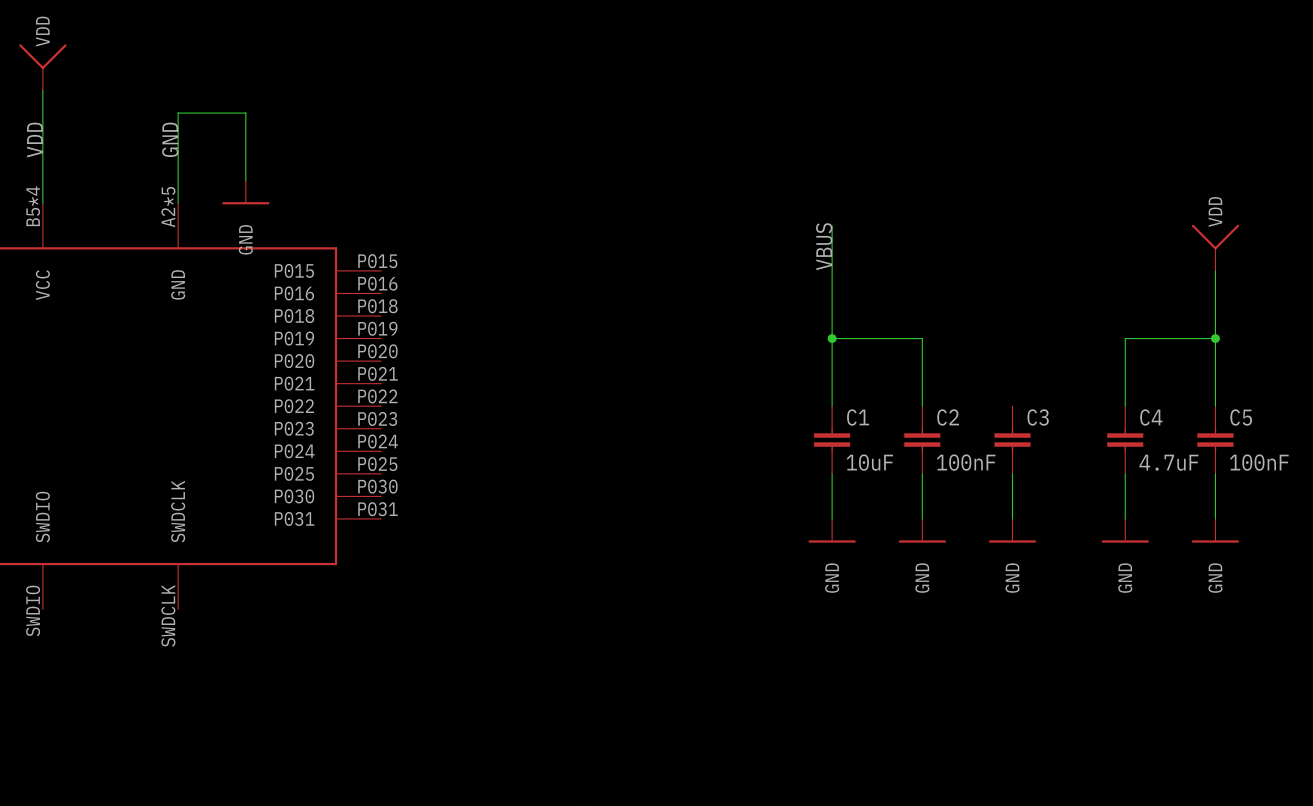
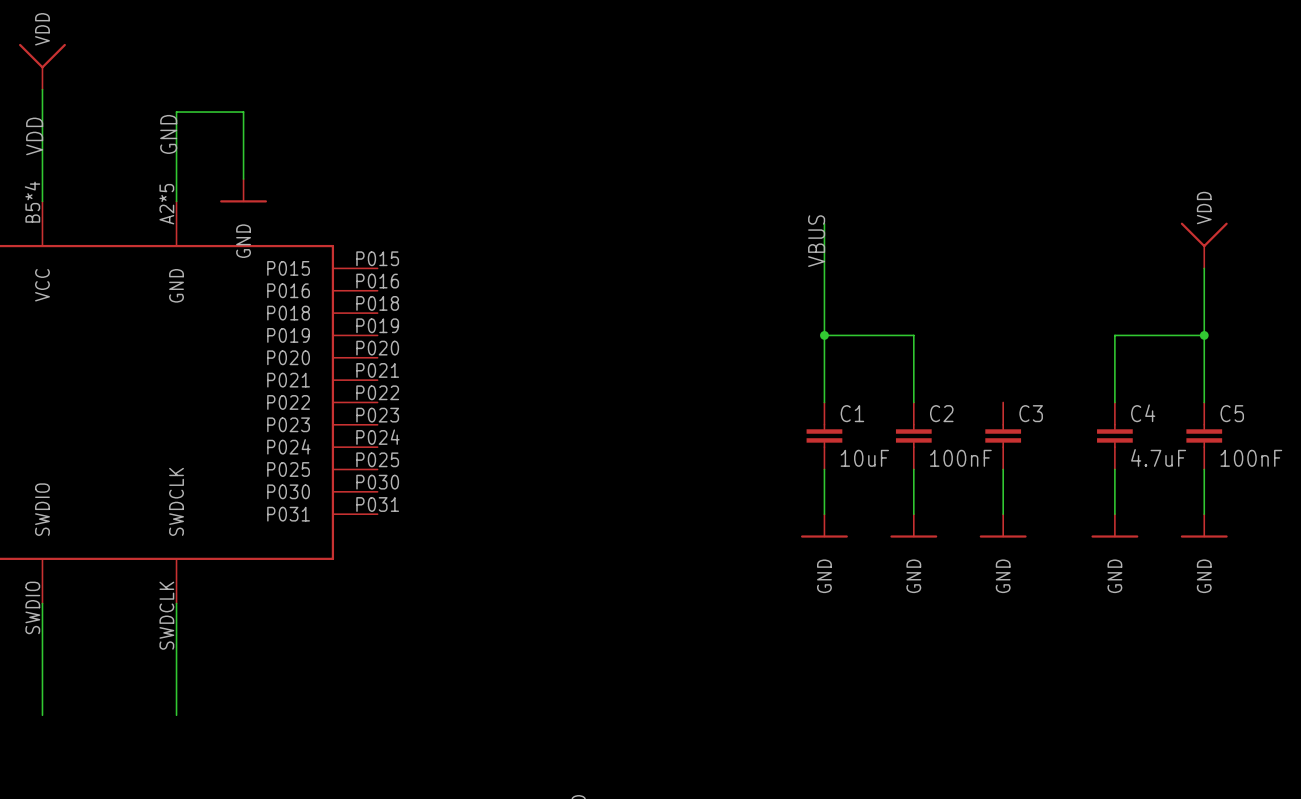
wire: none -> (42, 603) (42, 715)
wire: none -> (176, 603) (176, 715)

